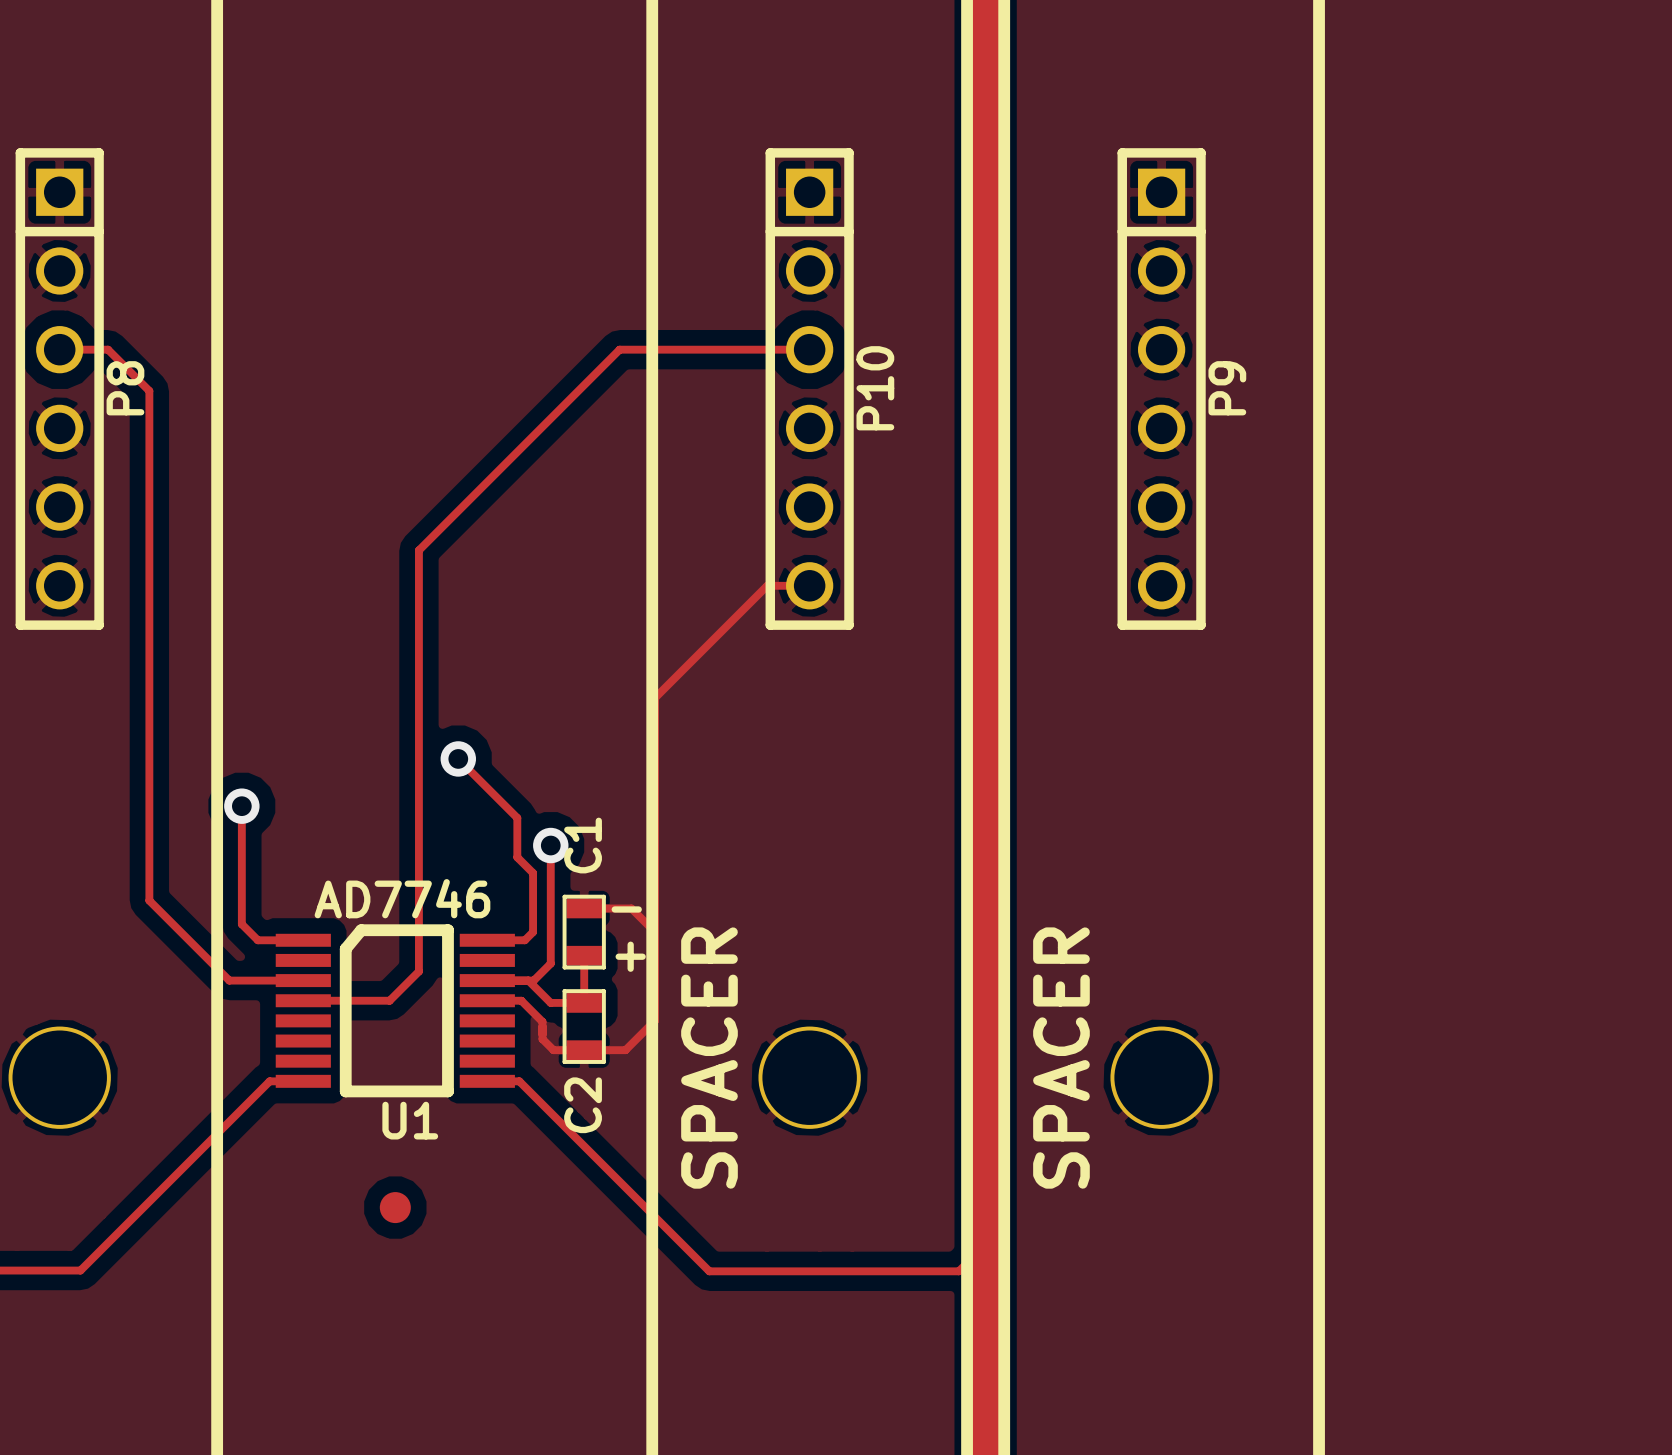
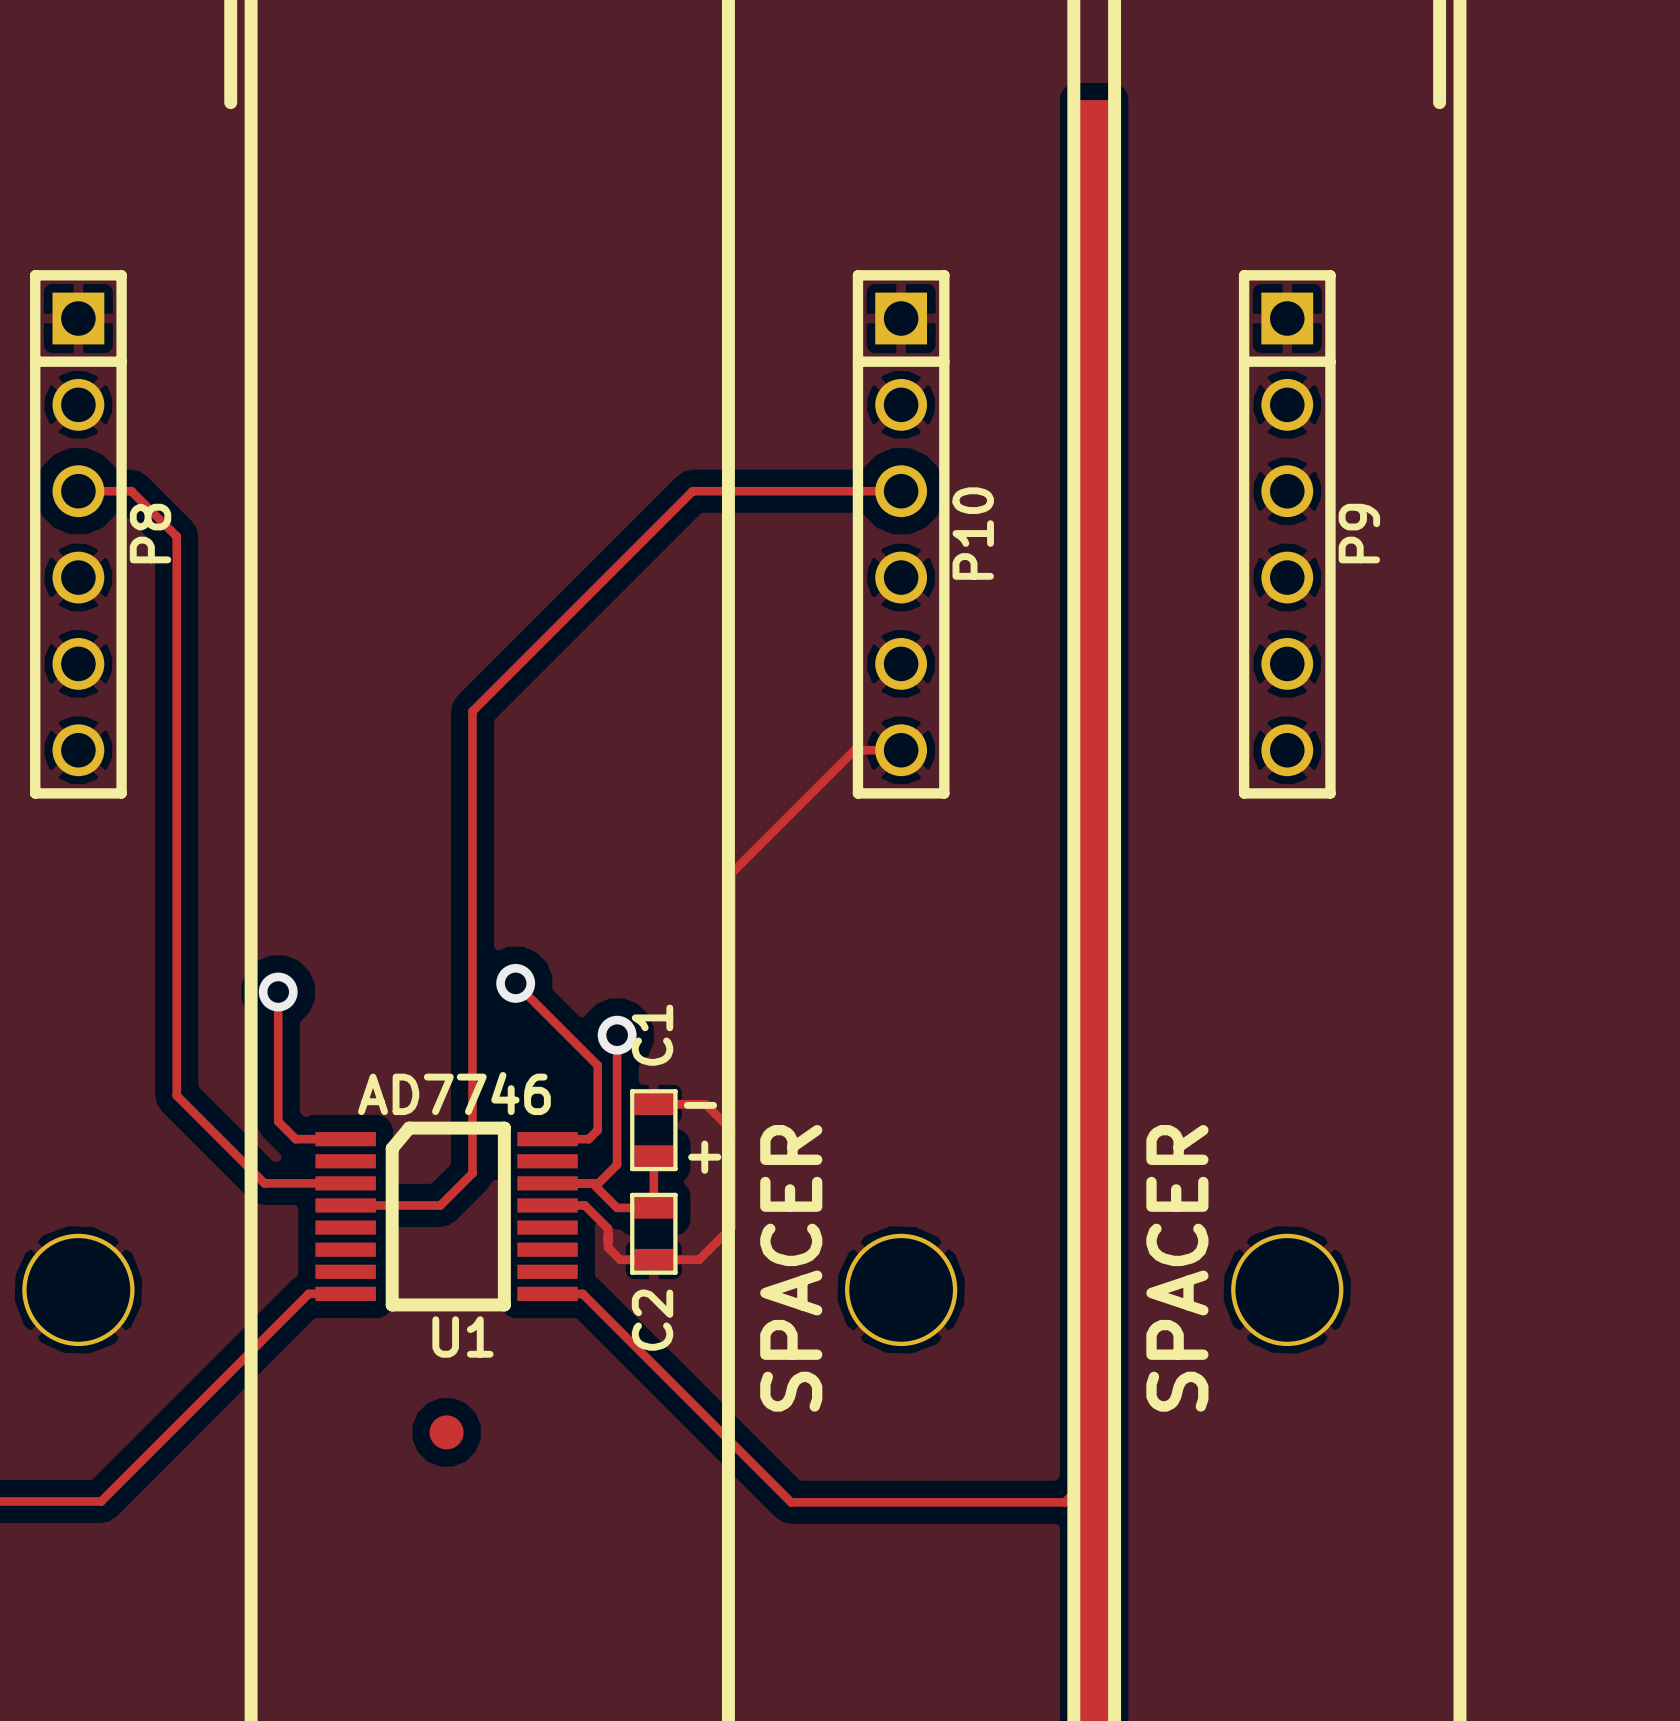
track: (458, 758) (517, 817) (517, 857) -> (515, 983) (580, 1048)
via position: (458, 758) -> (515, 983)

